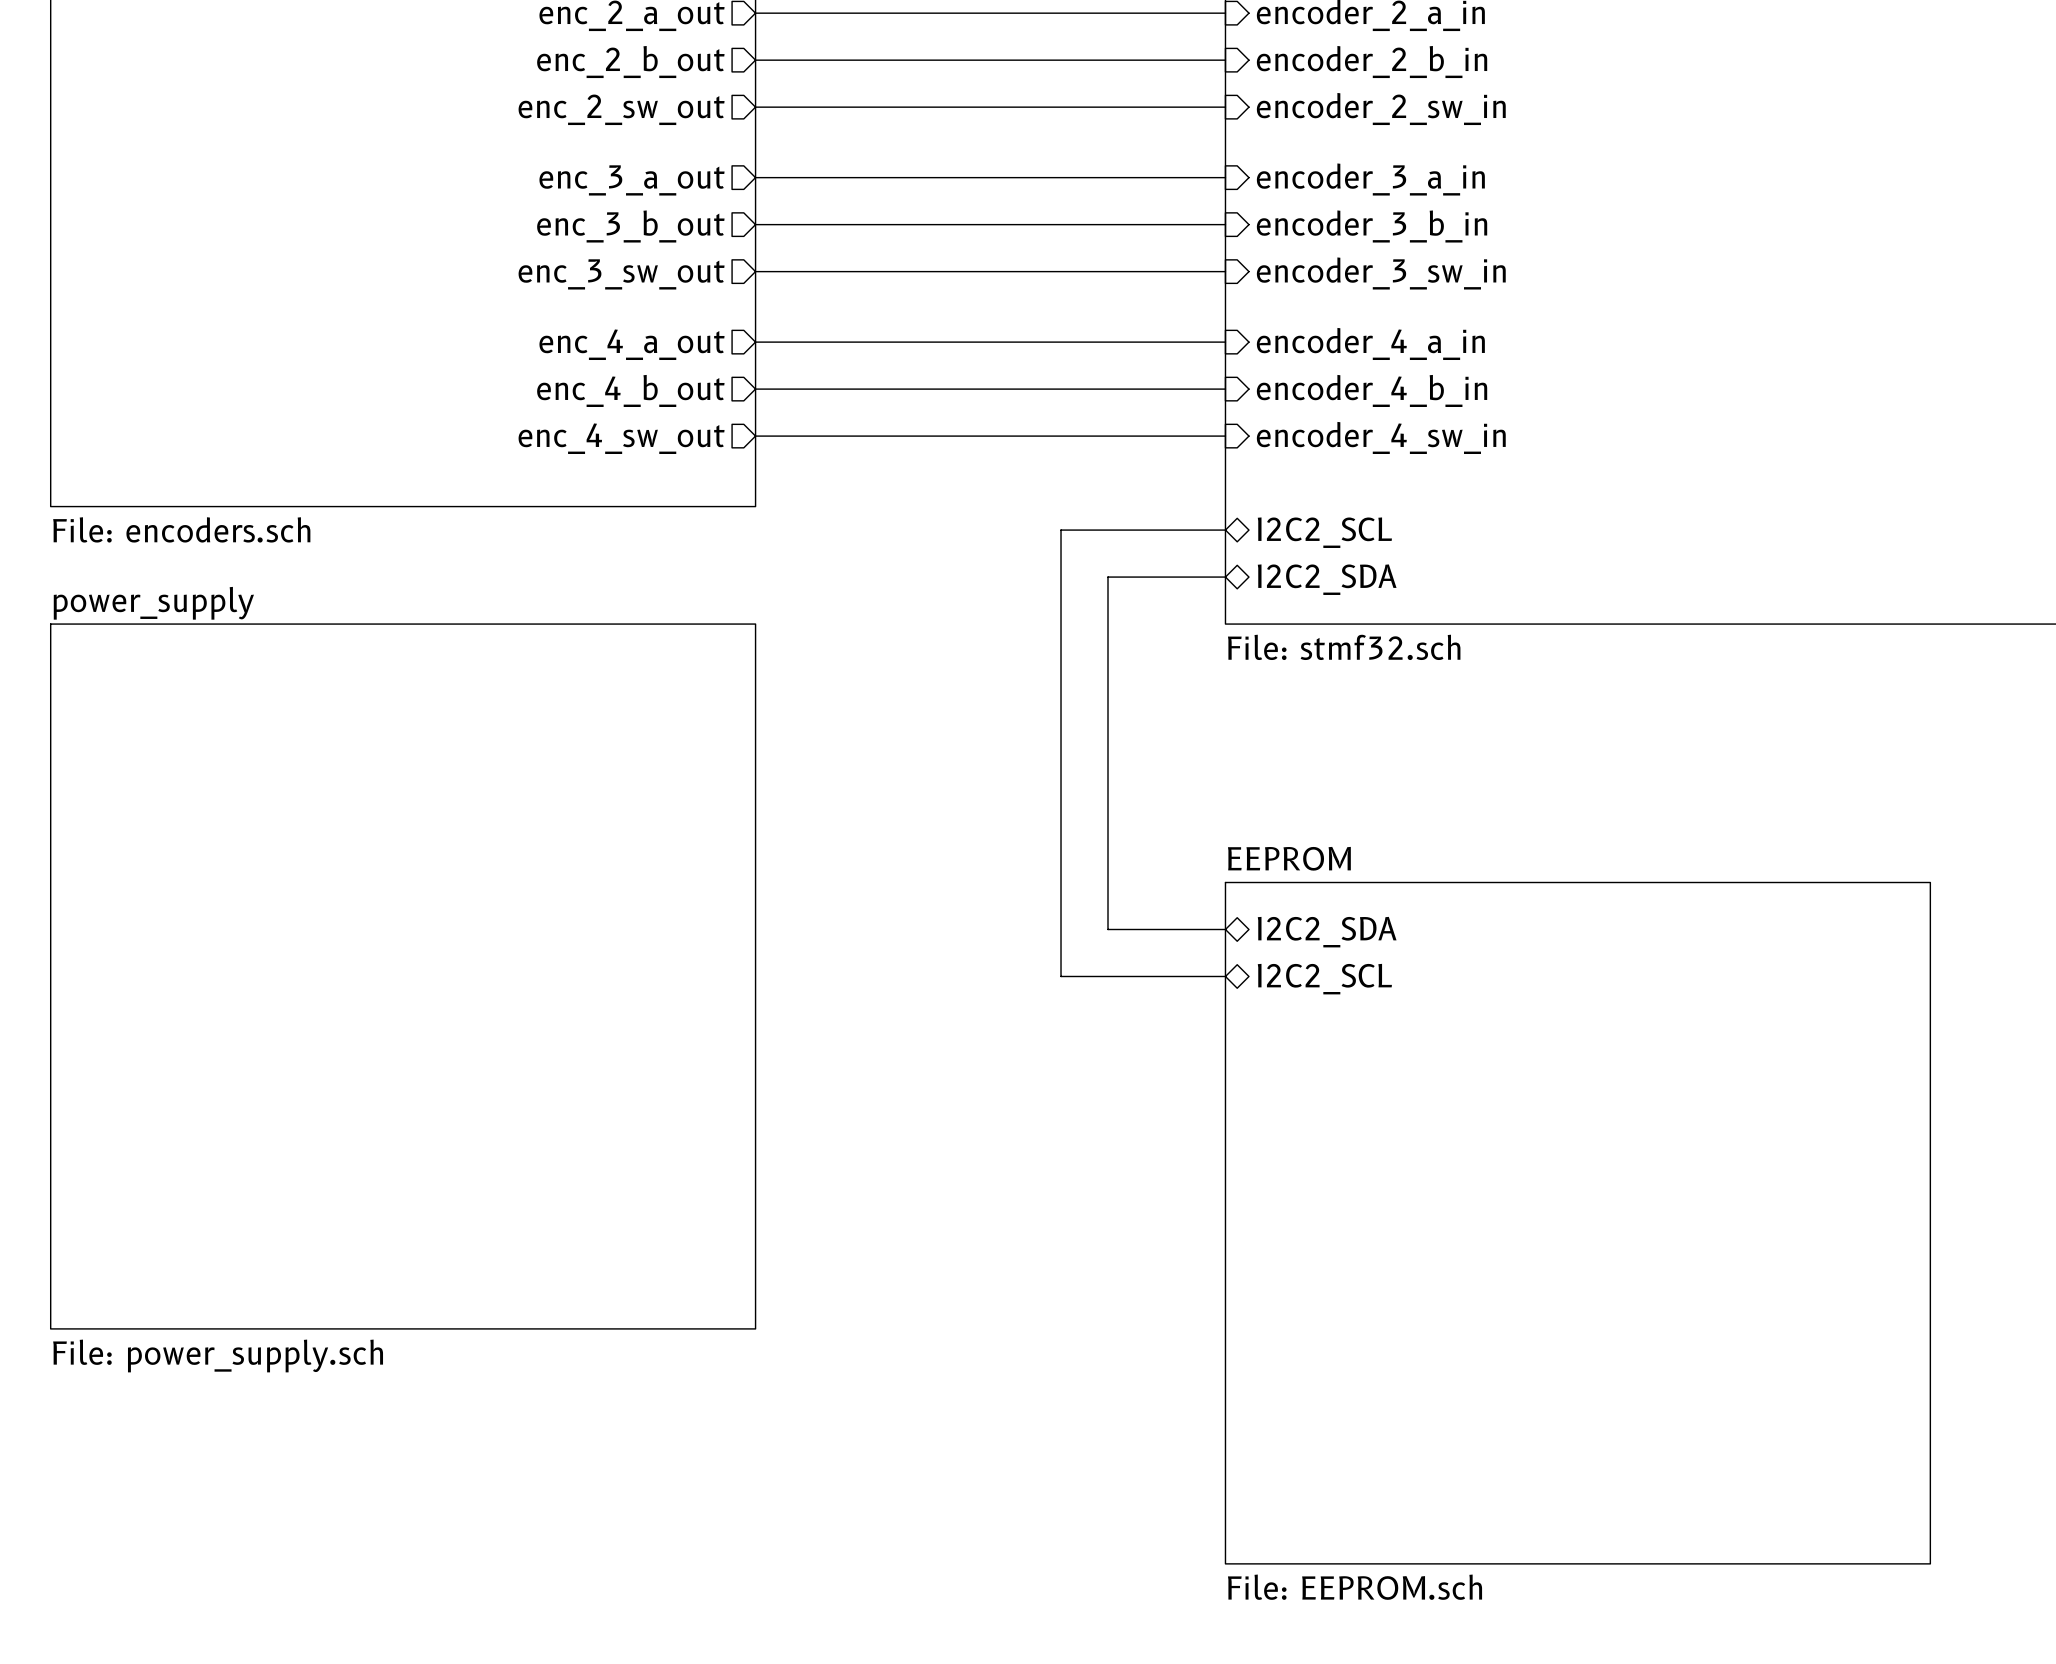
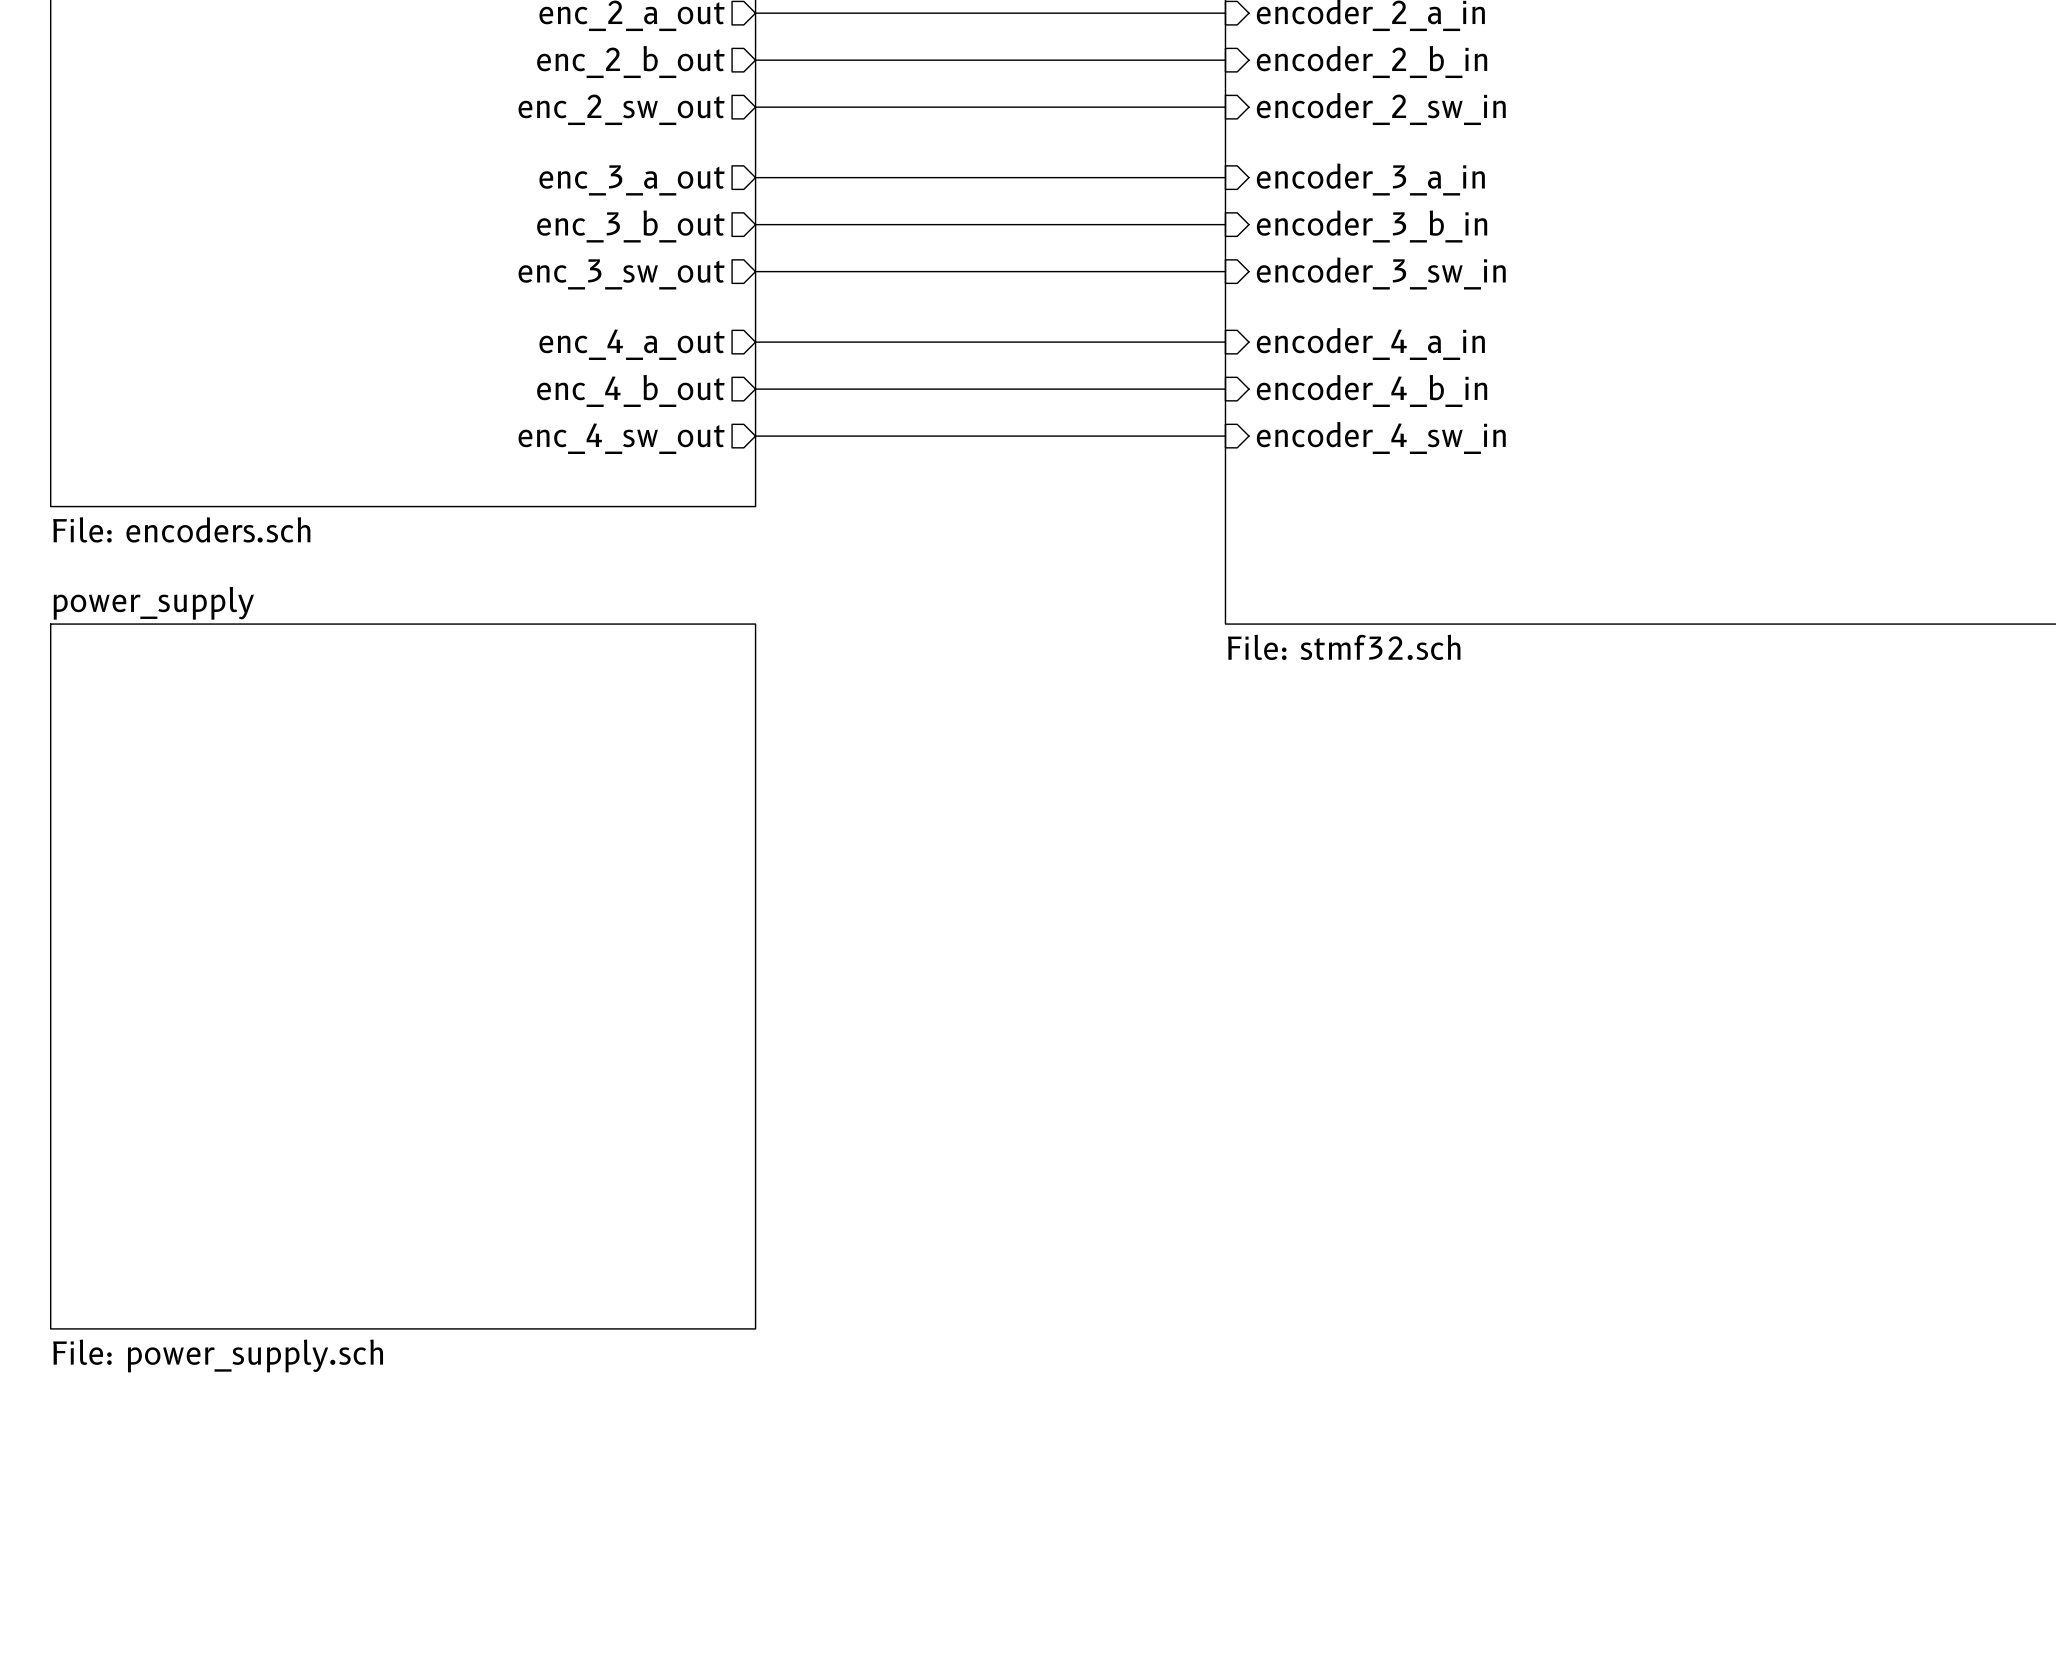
wire: (1225, 530) (1061, 530) (1061, 976) (1225, 976) -> none
sheet pin: I2C2_SCL (1324, 532) -> none
wire: (1225, 577) (1108, 577) (1108, 929) (1225, 929) -> none
sheet pin: I2C2_SDA (1327, 579) -> none
sheet pin: I2C2_SDA (1327, 932) -> none
sheet pin: I2C2_SCL (1324, 979) -> none
sheet EEPROM: File: EEPROM.sch (1577, 1223) -> none

